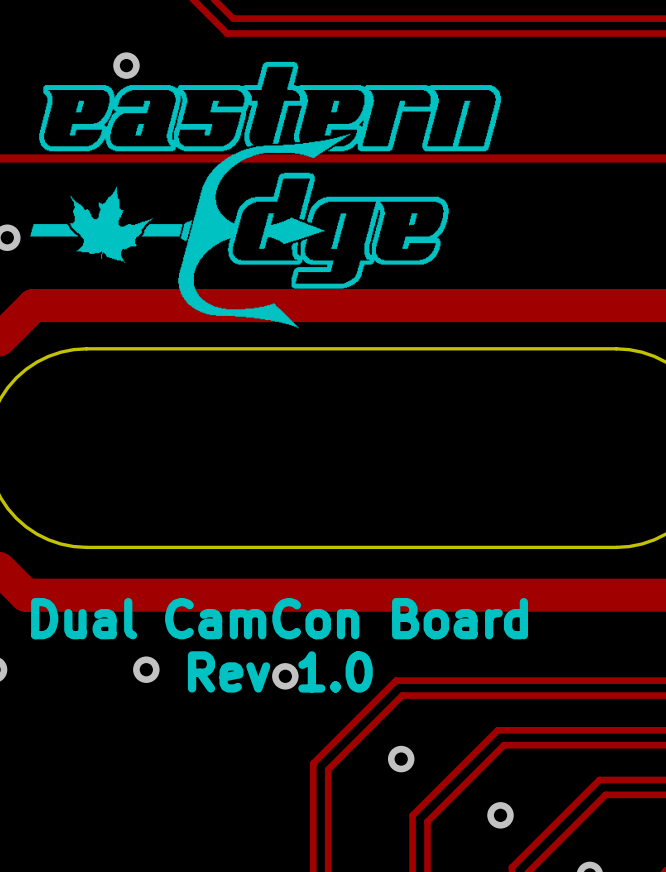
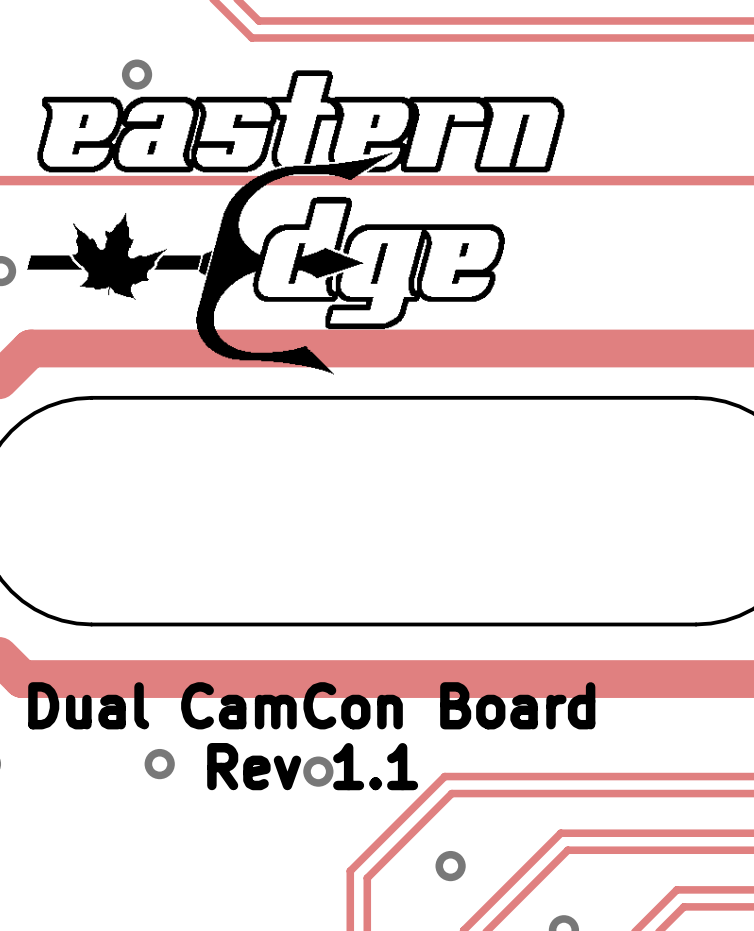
text: Rev 1.0 (280, 671) -> Rev 1.1 (312, 766)

